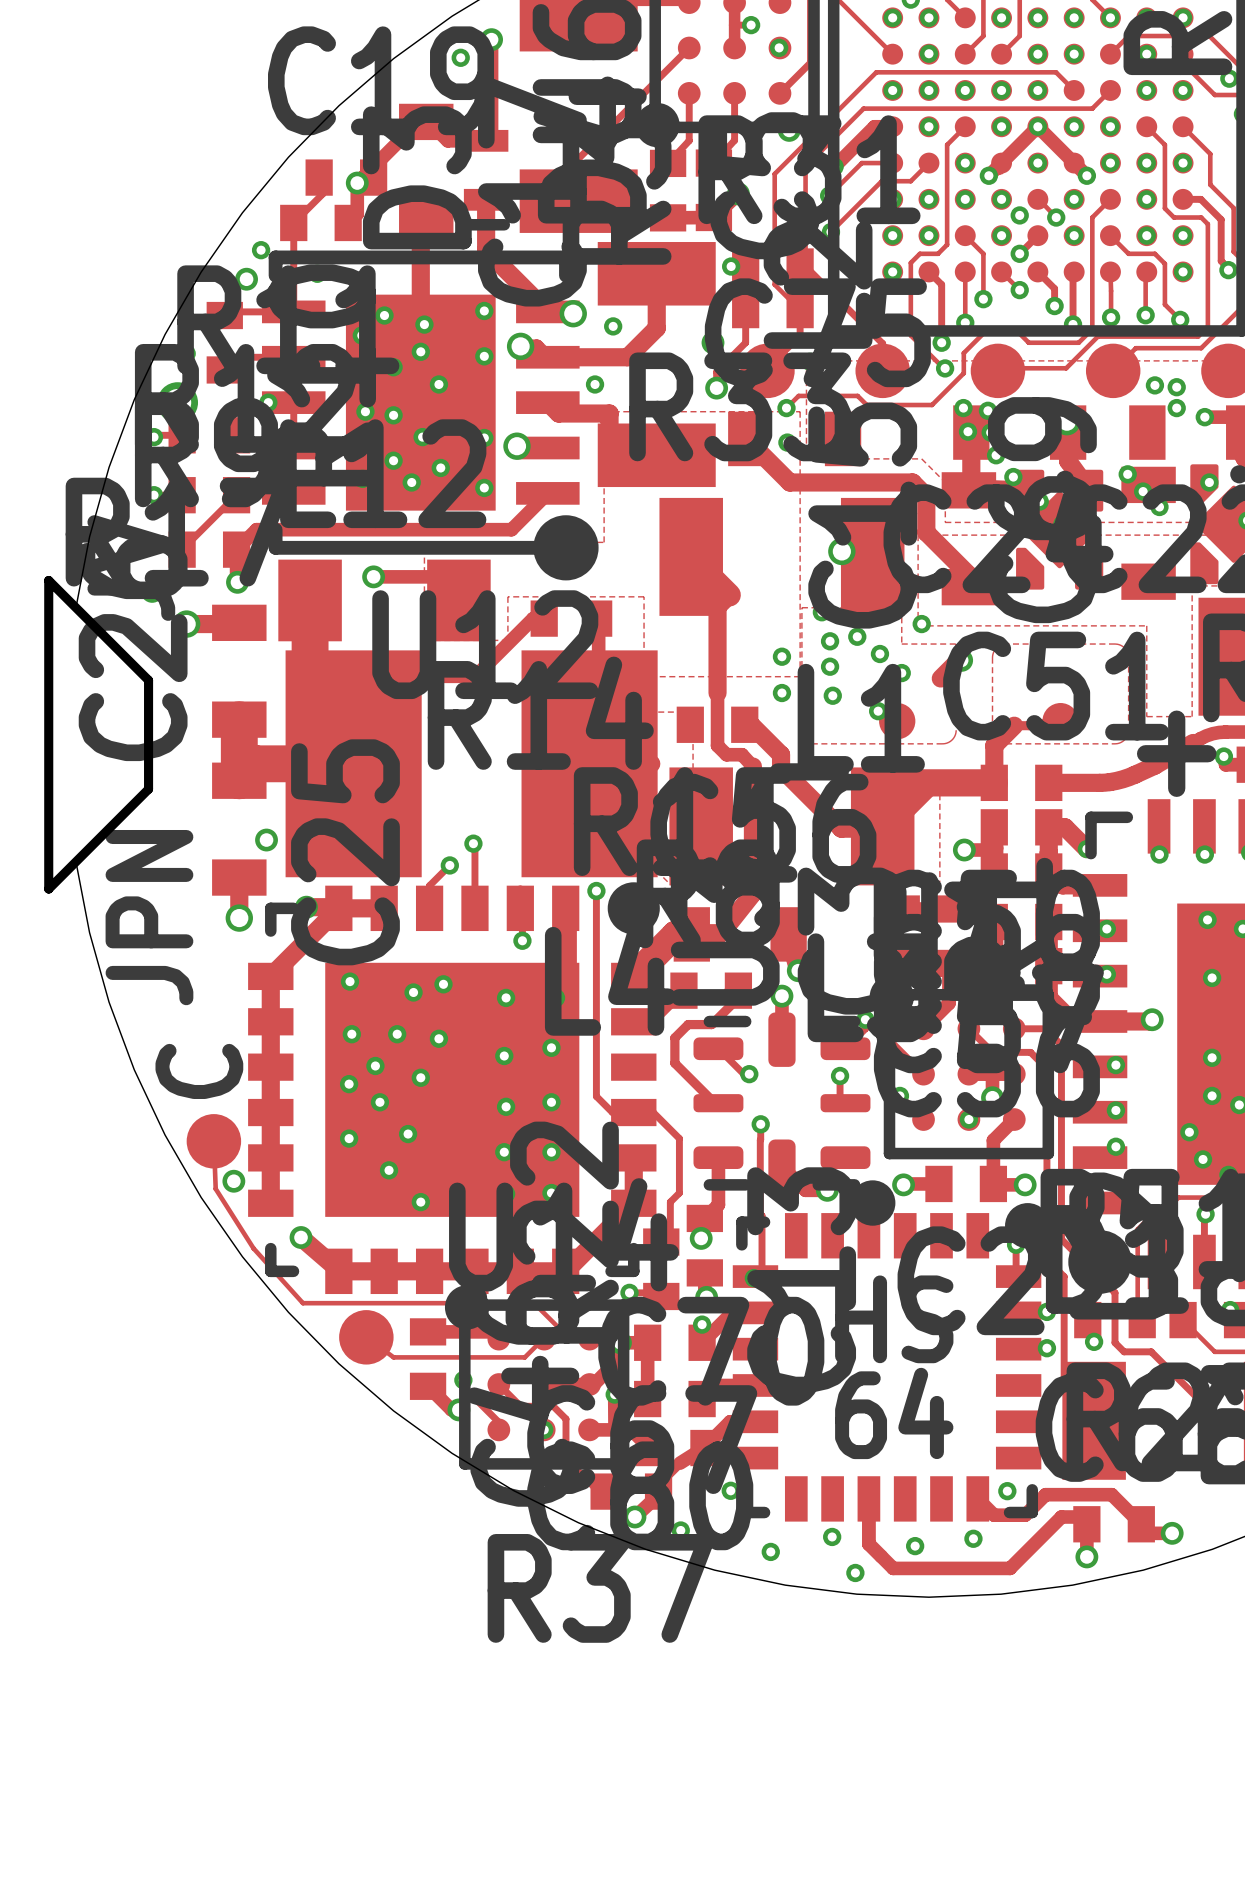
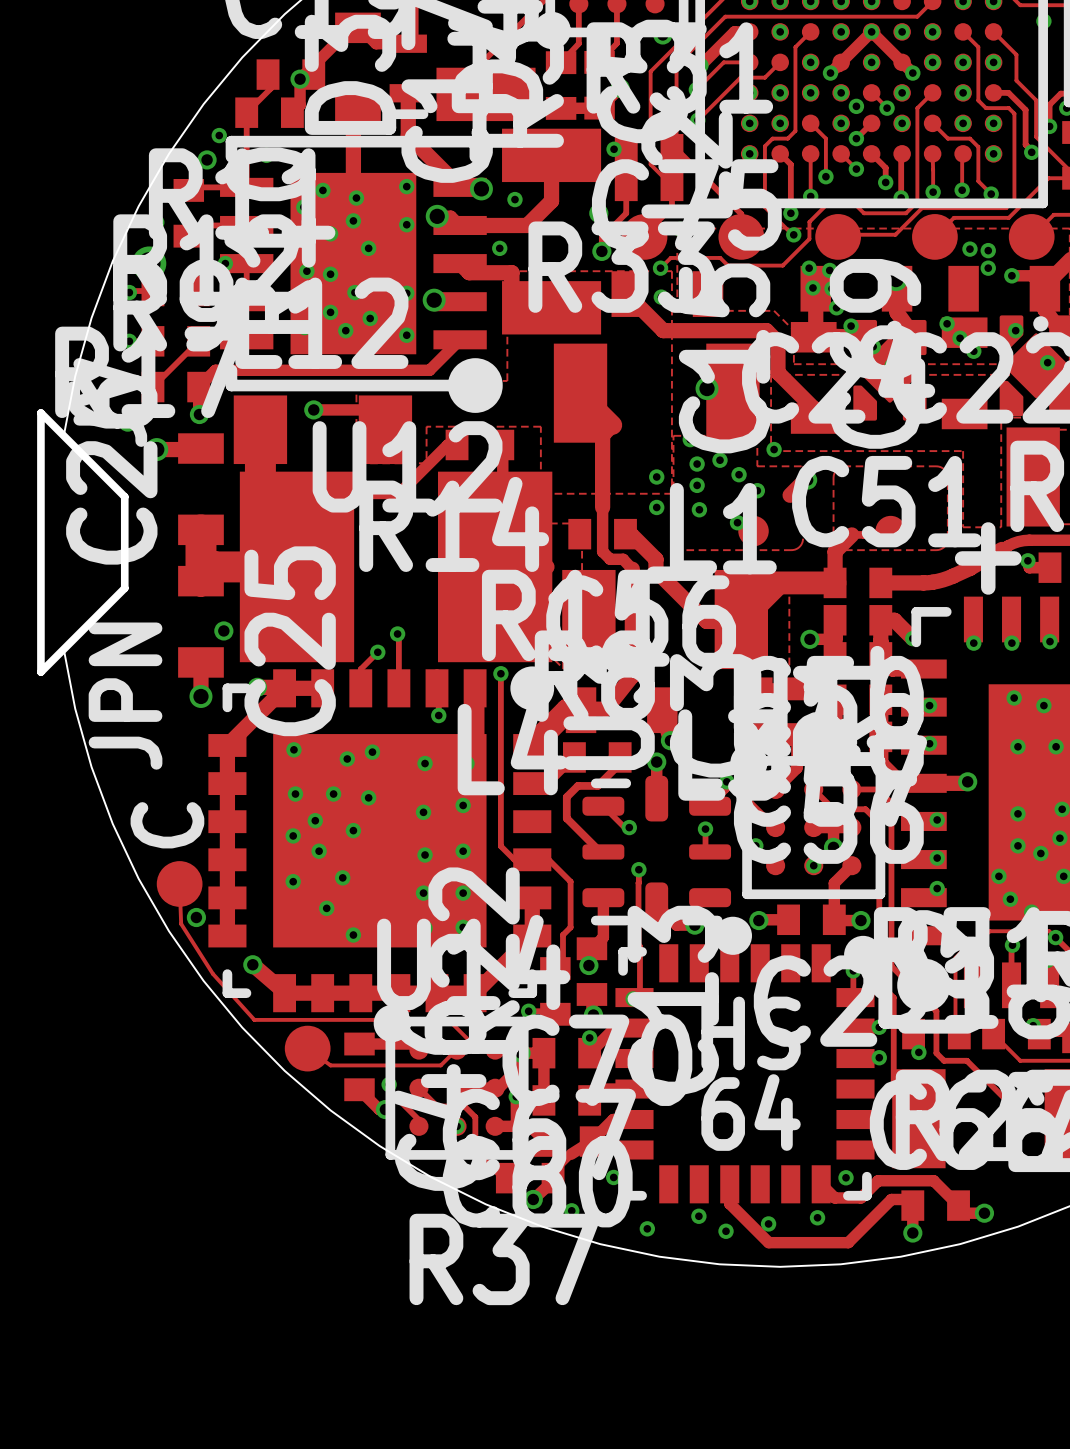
track: (868, 1521) (868, 1544) (893, 1568) (915, 1568) -> (729, 1203) (768, 1242)
via position: (855, 1572) -> (726, 1231)

